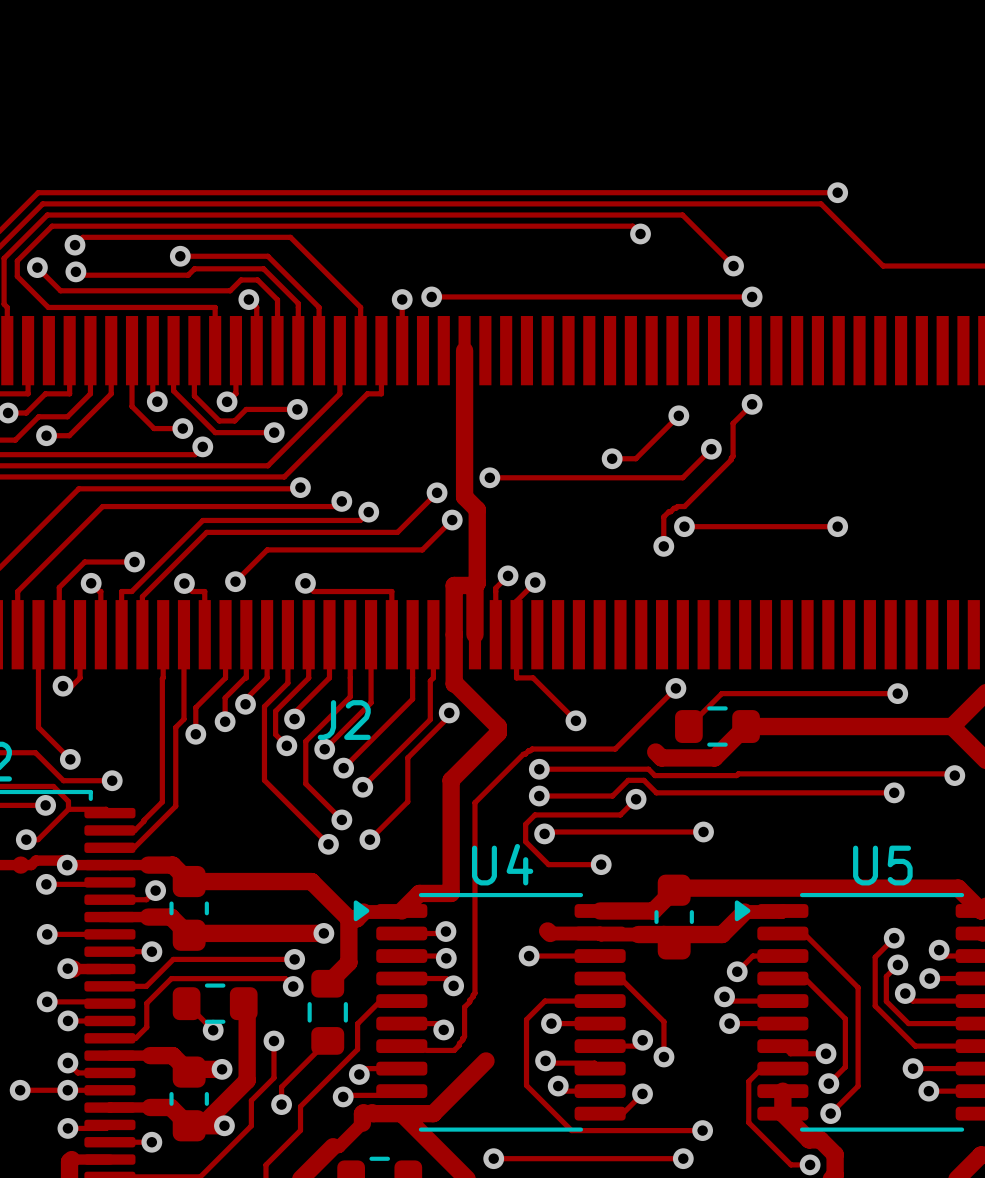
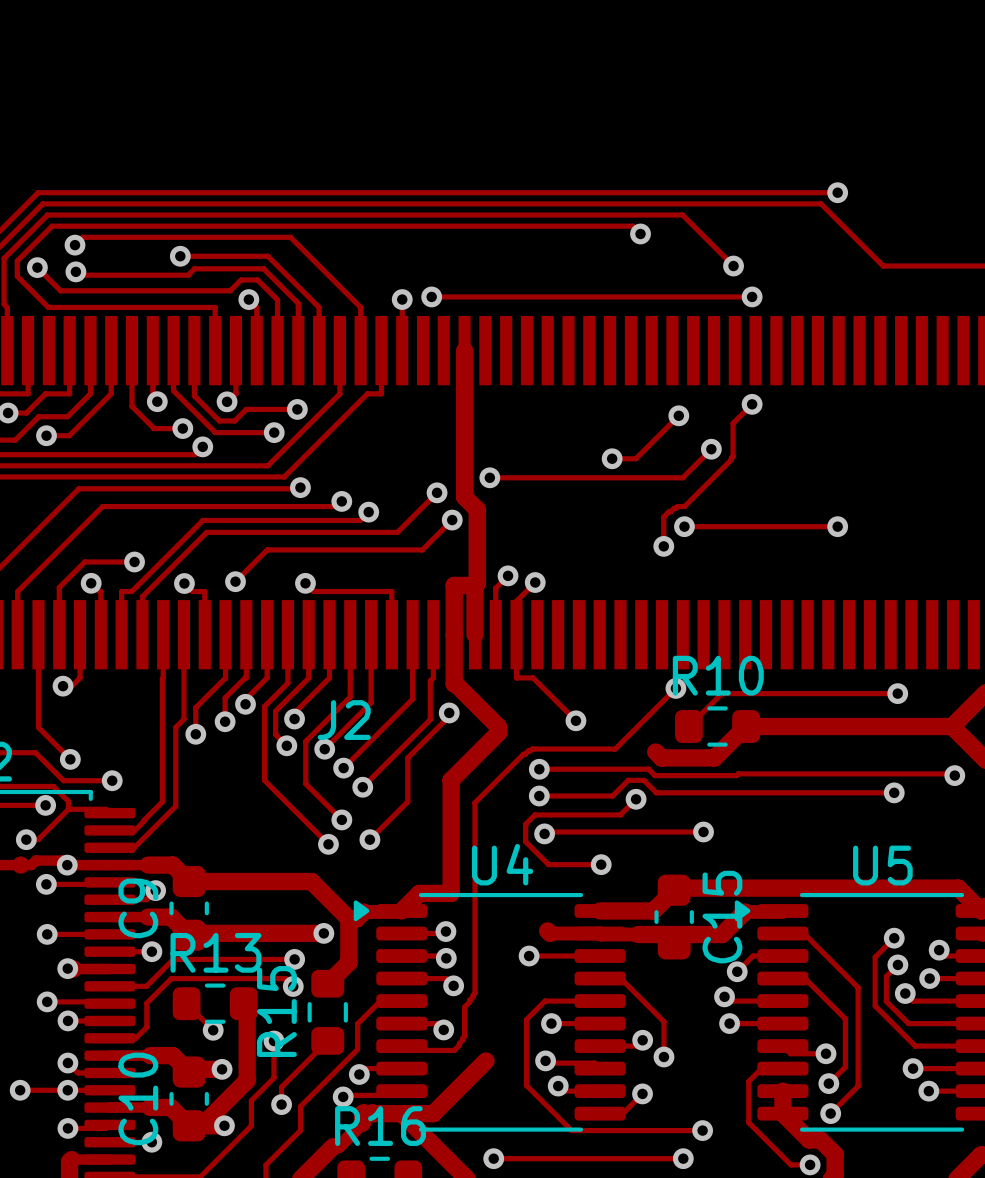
R10 name: none -> R10 (718, 675)
C9 name: none -> C9 (138, 908)
C15 name: none -> C15 (722, 917)
R13 name: none -> R13 (215, 952)
R15 name: none -> R15 (276, 1011)
C10 name: none -> C10 (138, 1098)
R16 name: none -> R16 (380, 1126)

